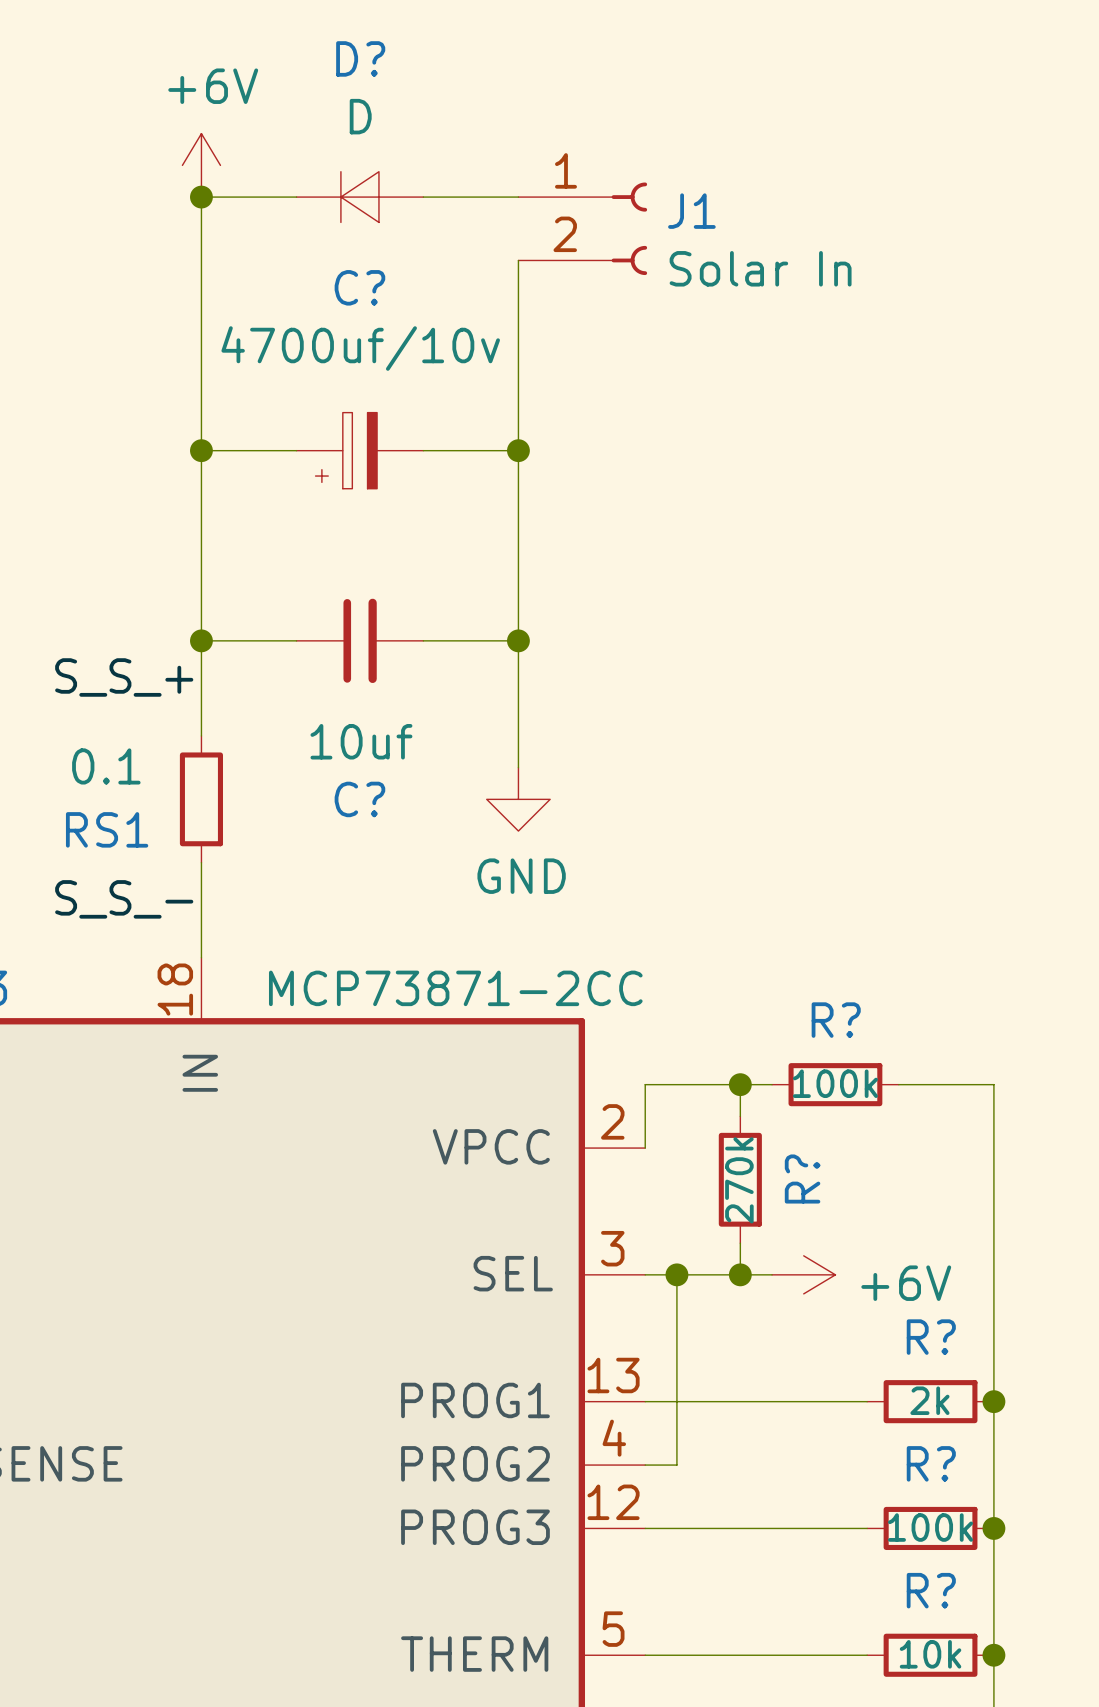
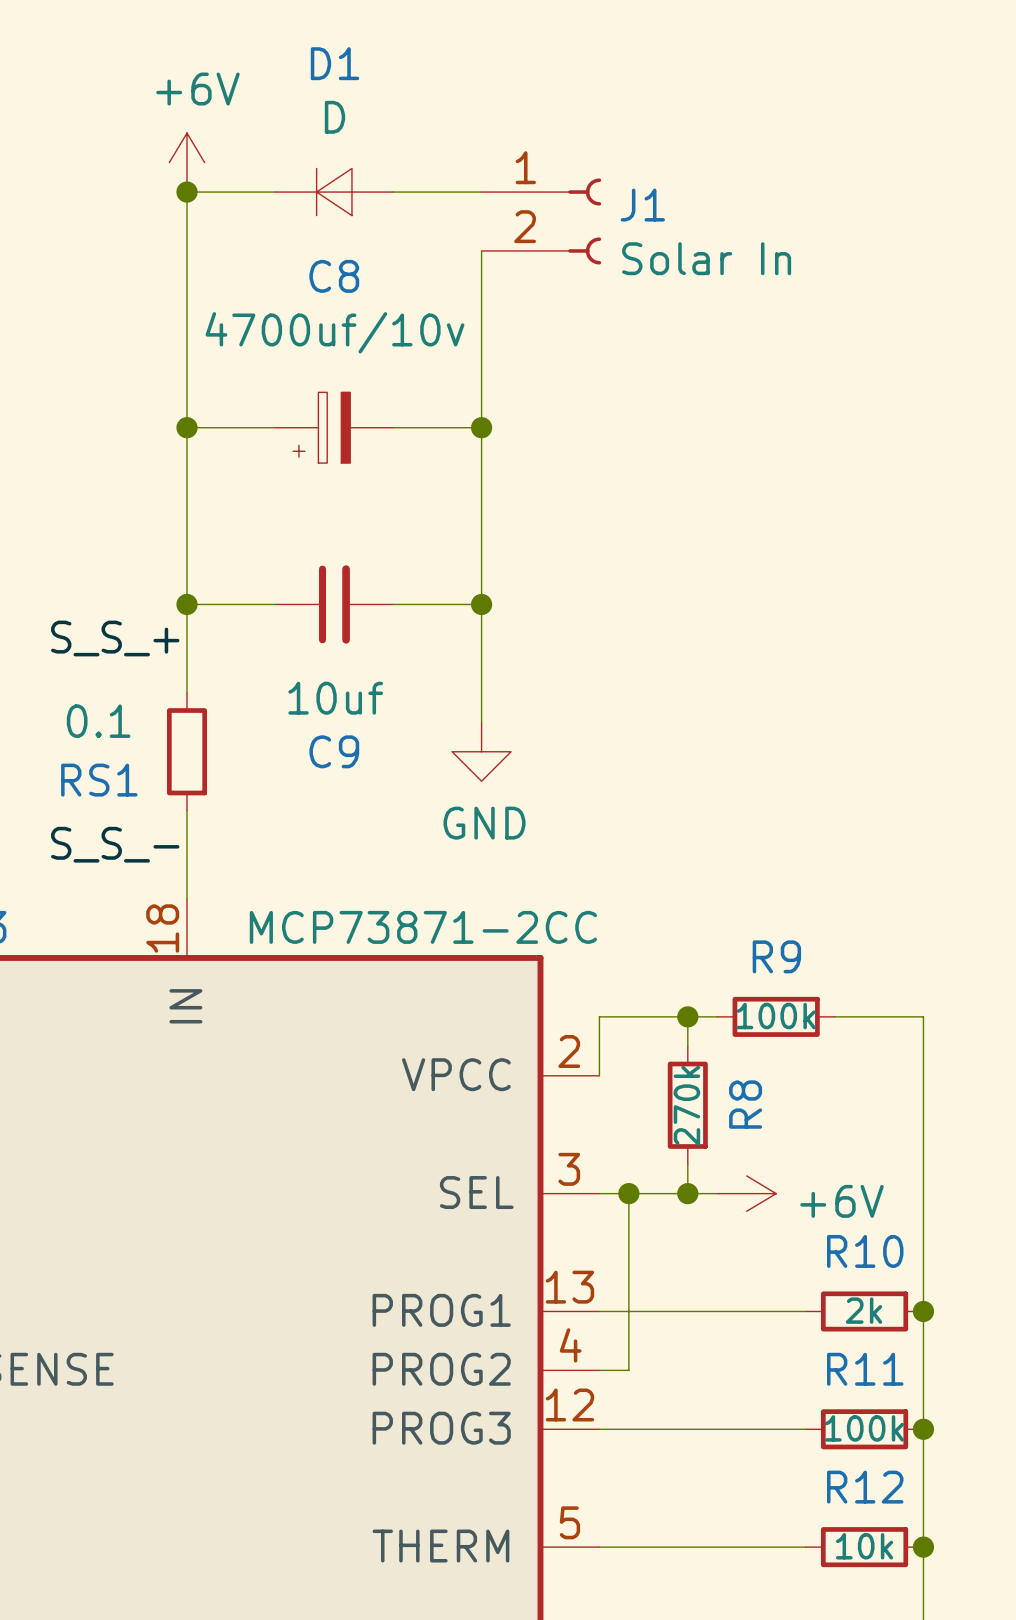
D? name: D? (360, 58) -> D1 (335, 63)
C? name: C? (359, 287) -> C8 (334, 276)
C? name: C? (359, 799) -> C9 (334, 751)
R? name: R? (836, 1020) -> R9 (776, 956)
R? name: R? (802, 1179) -> R8 (745, 1104)
R? name: R? (931, 1337) -> R10 (865, 1251)
R? name: R? (931, 1463) -> R11 (865, 1369)
R? name: R? (931, 1590) -> R12 (865, 1487)

